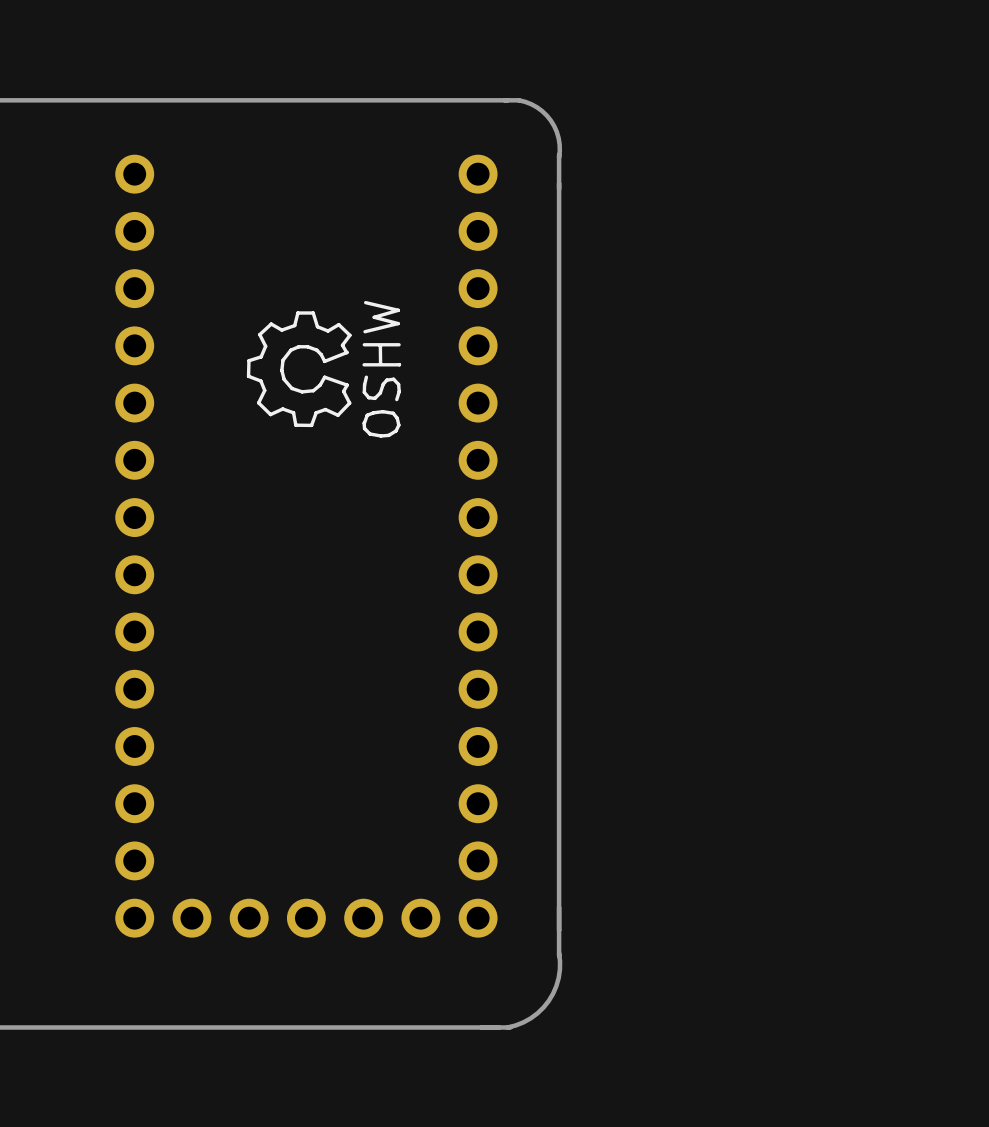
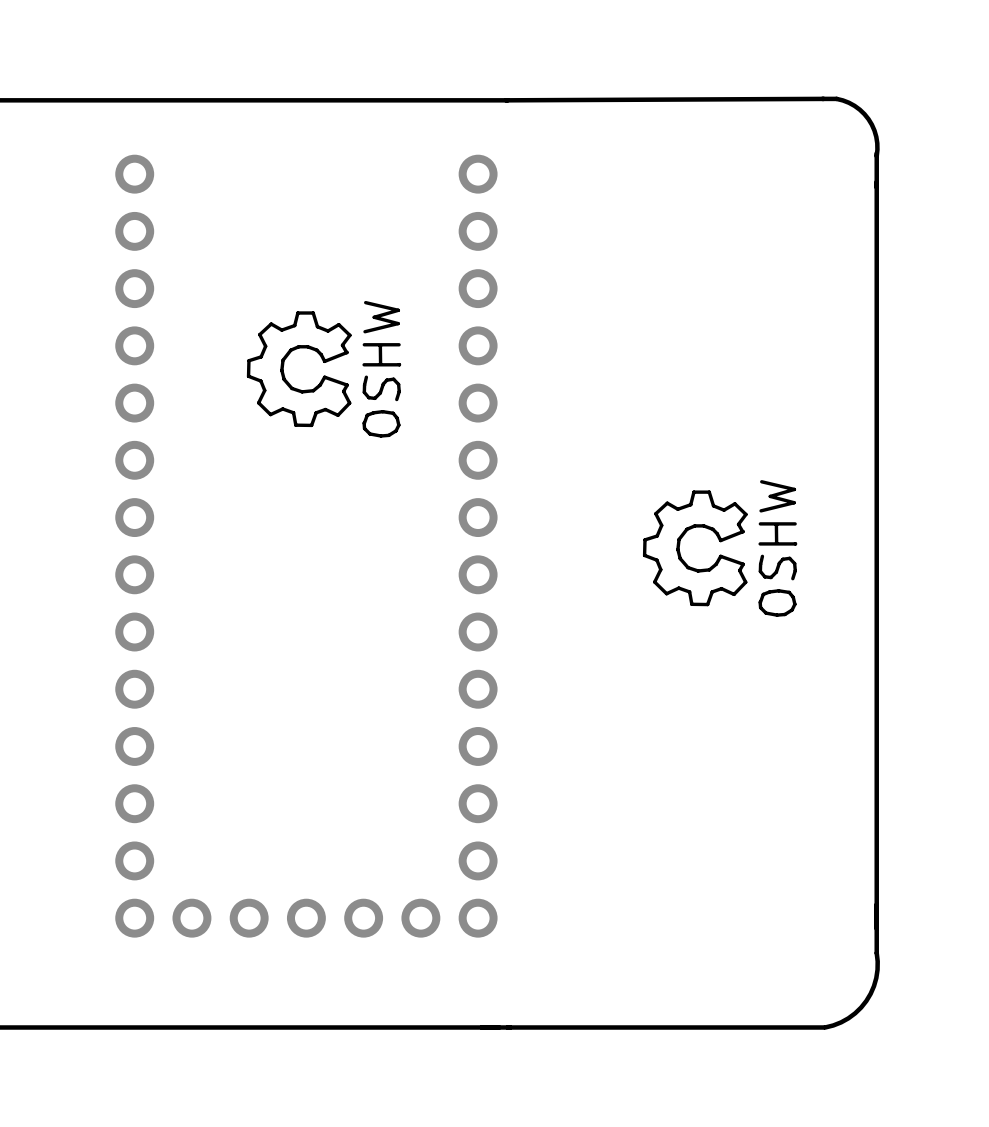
board edge: none -> (822, 98) (842, 100) (854, 105) (864, 114) (871, 124) (876, 136) (876, 156)
board edge: none -> (823, 98) (506, 100)
board edge: (507, 100) (525, 101) (536, 107) (546, 115) (554, 126) (558, 138) (559, 157) -> none
board edge: none -> (876, 153) (877, 969) (874, 986) (861, 1007) (848, 1018) (825, 1027)
board edge: (559, 154) (559, 955) -> none
drawing: none -> [642, 480, 798, 617]
board edge: (559, 953) (558, 978) (548, 1000) (530, 1018) (507, 1027) -> none
board edge: none -> (823, 1027) (510, 1027)

